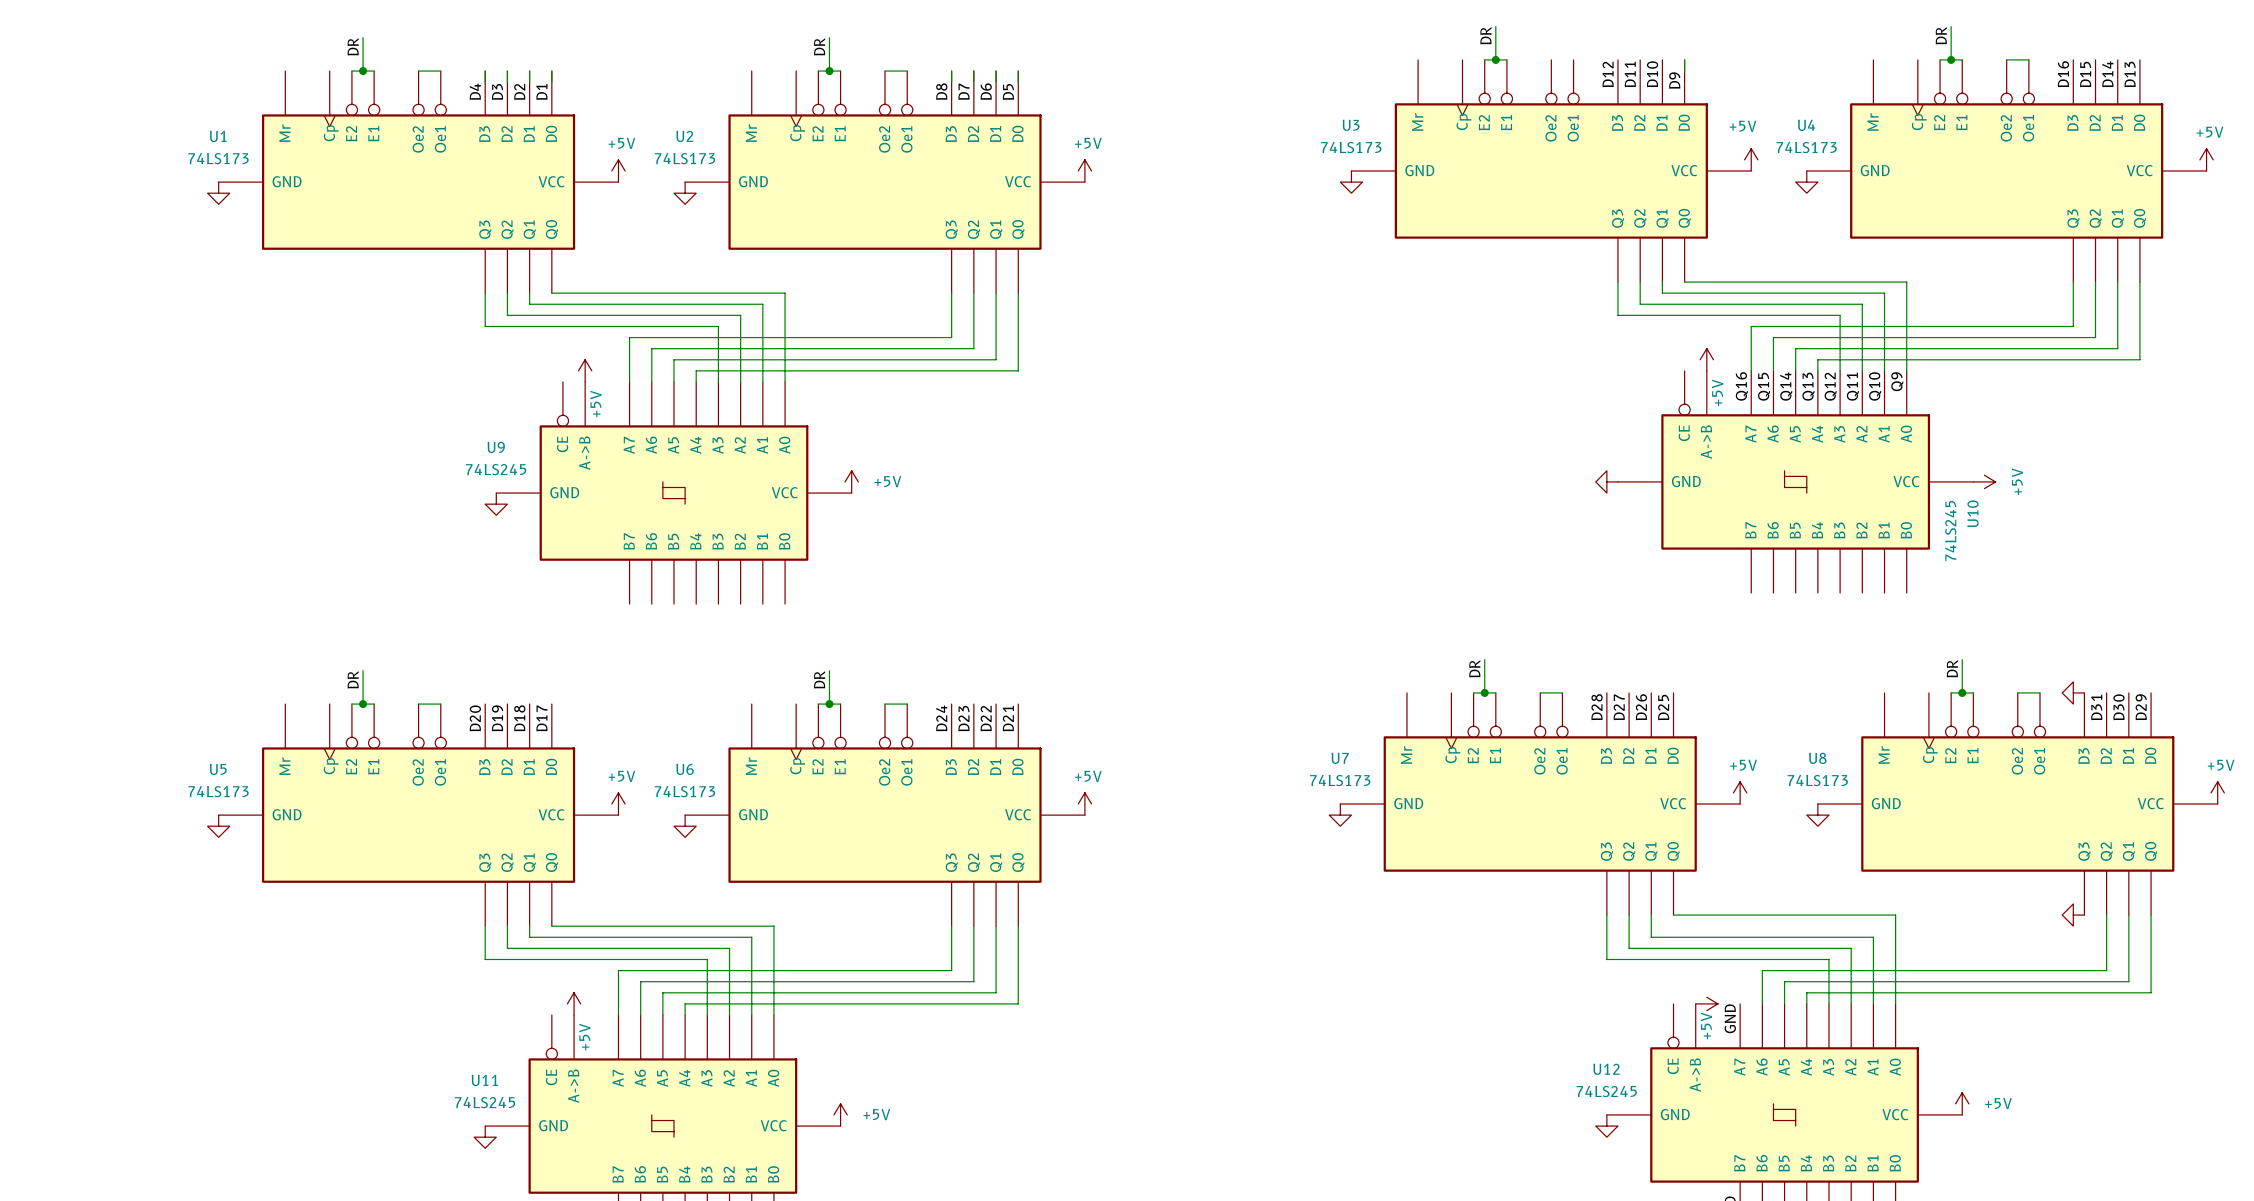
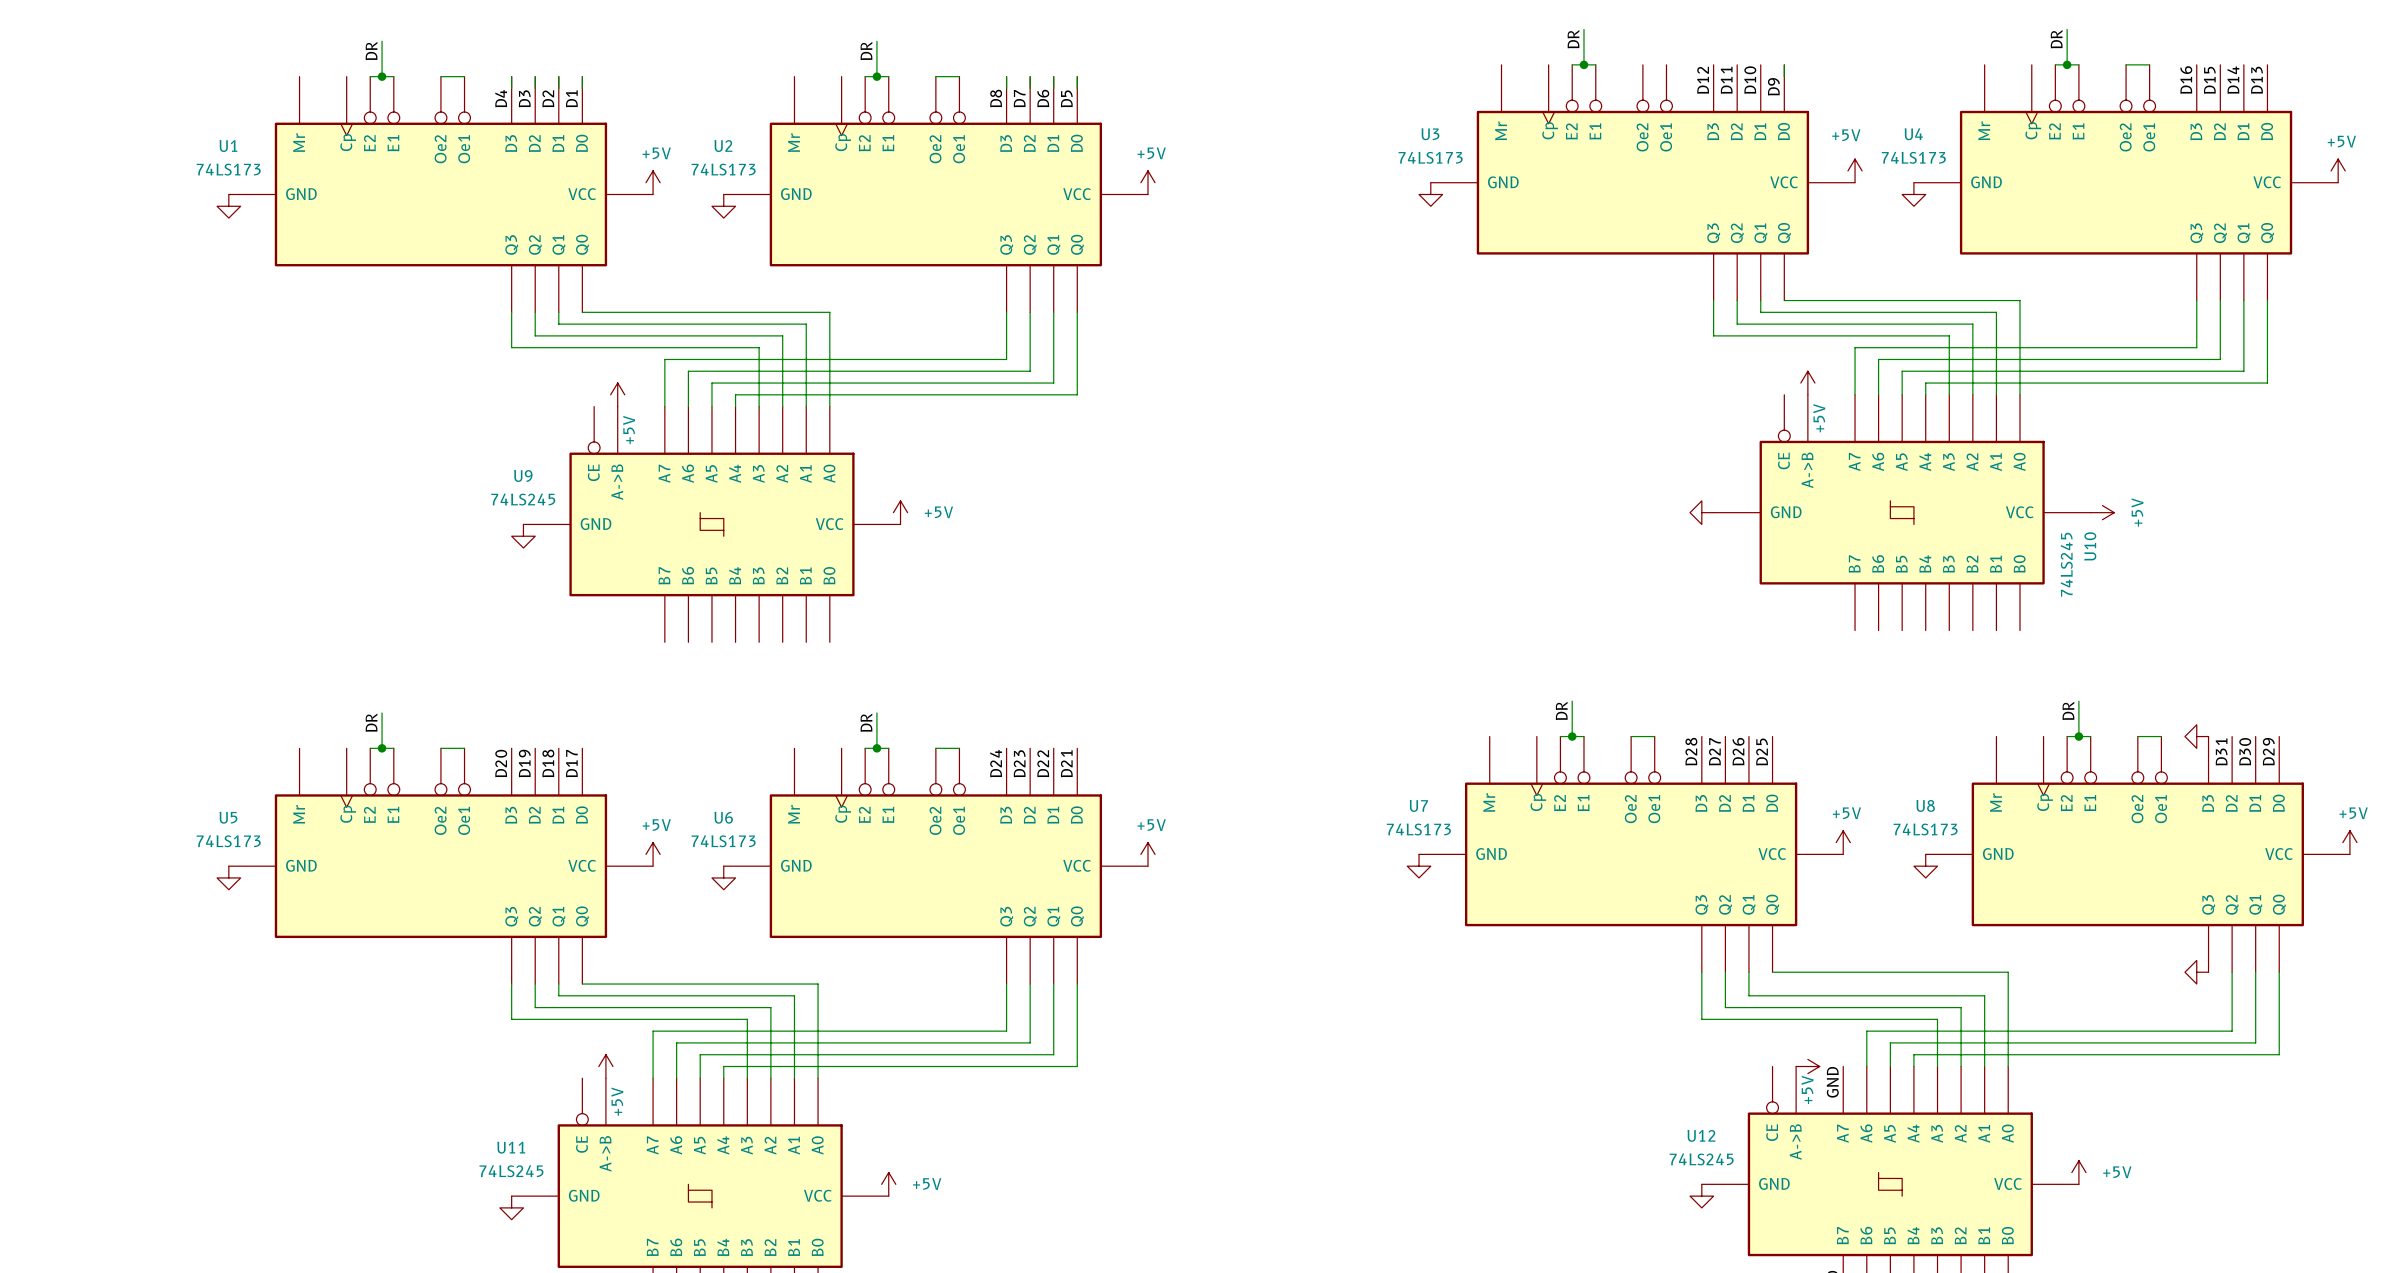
label: Q9 (1897, 381) -> none
label: Q16 (1741, 386) -> none
label: Q15 (1764, 386) -> none
label: Q14 (1786, 386) -> none
label: Q13 (1808, 386) -> none
label: Q12 (1830, 386) -> none
label: Q11 (1852, 386) -> none
label: Q10 (1875, 386) -> none

